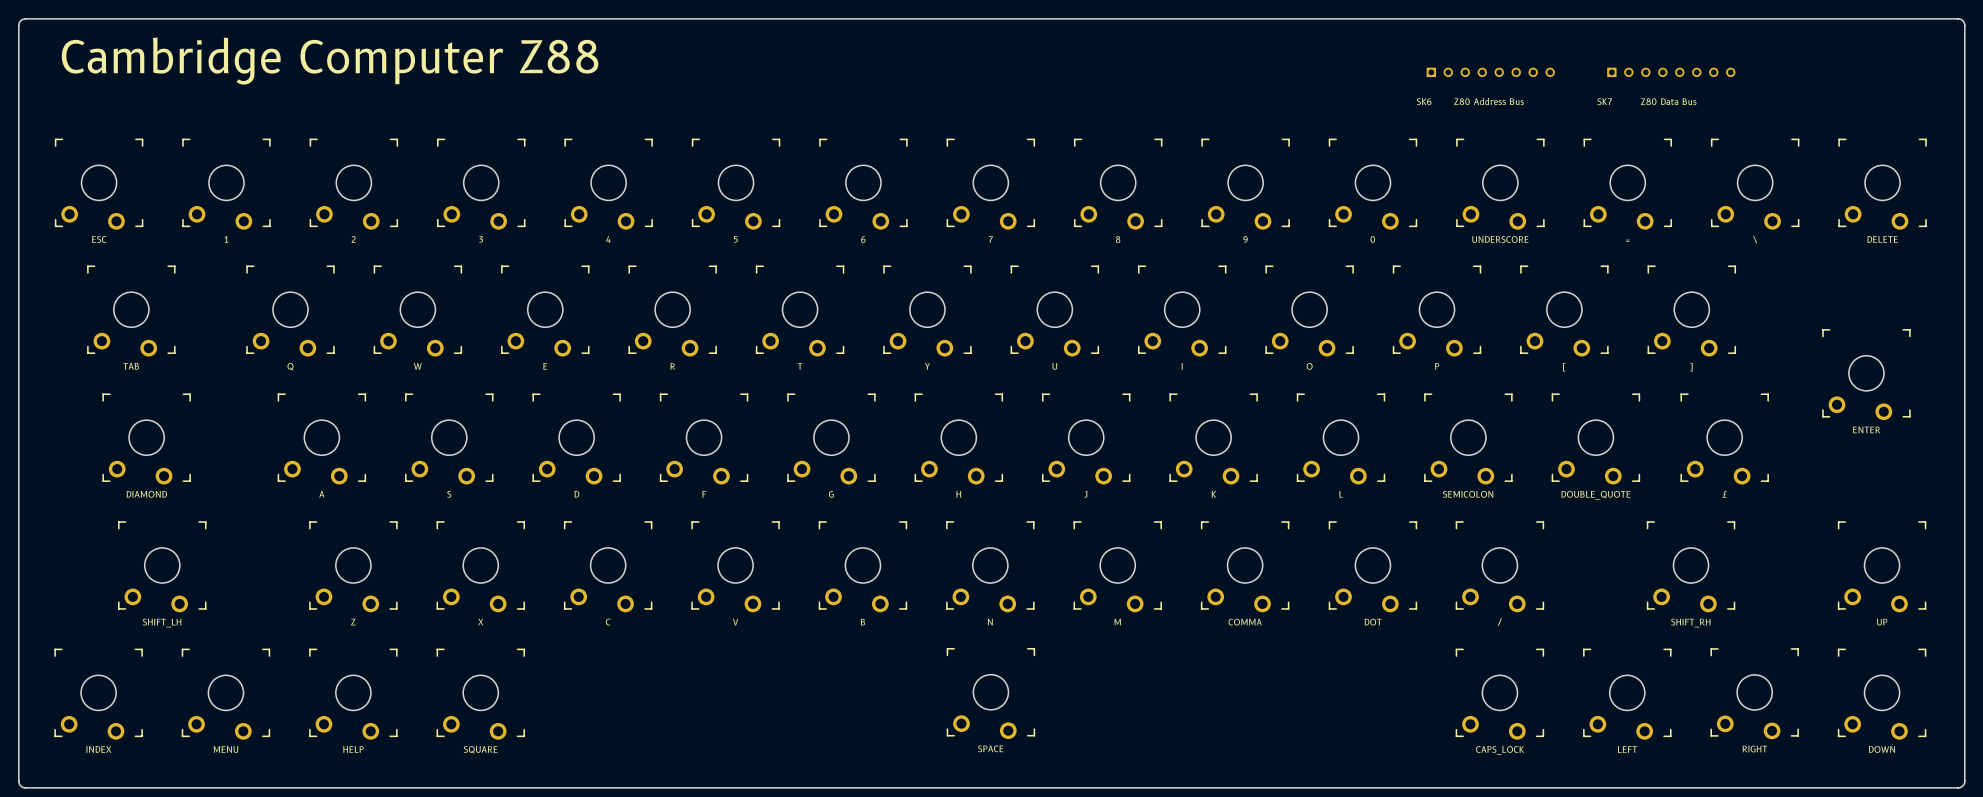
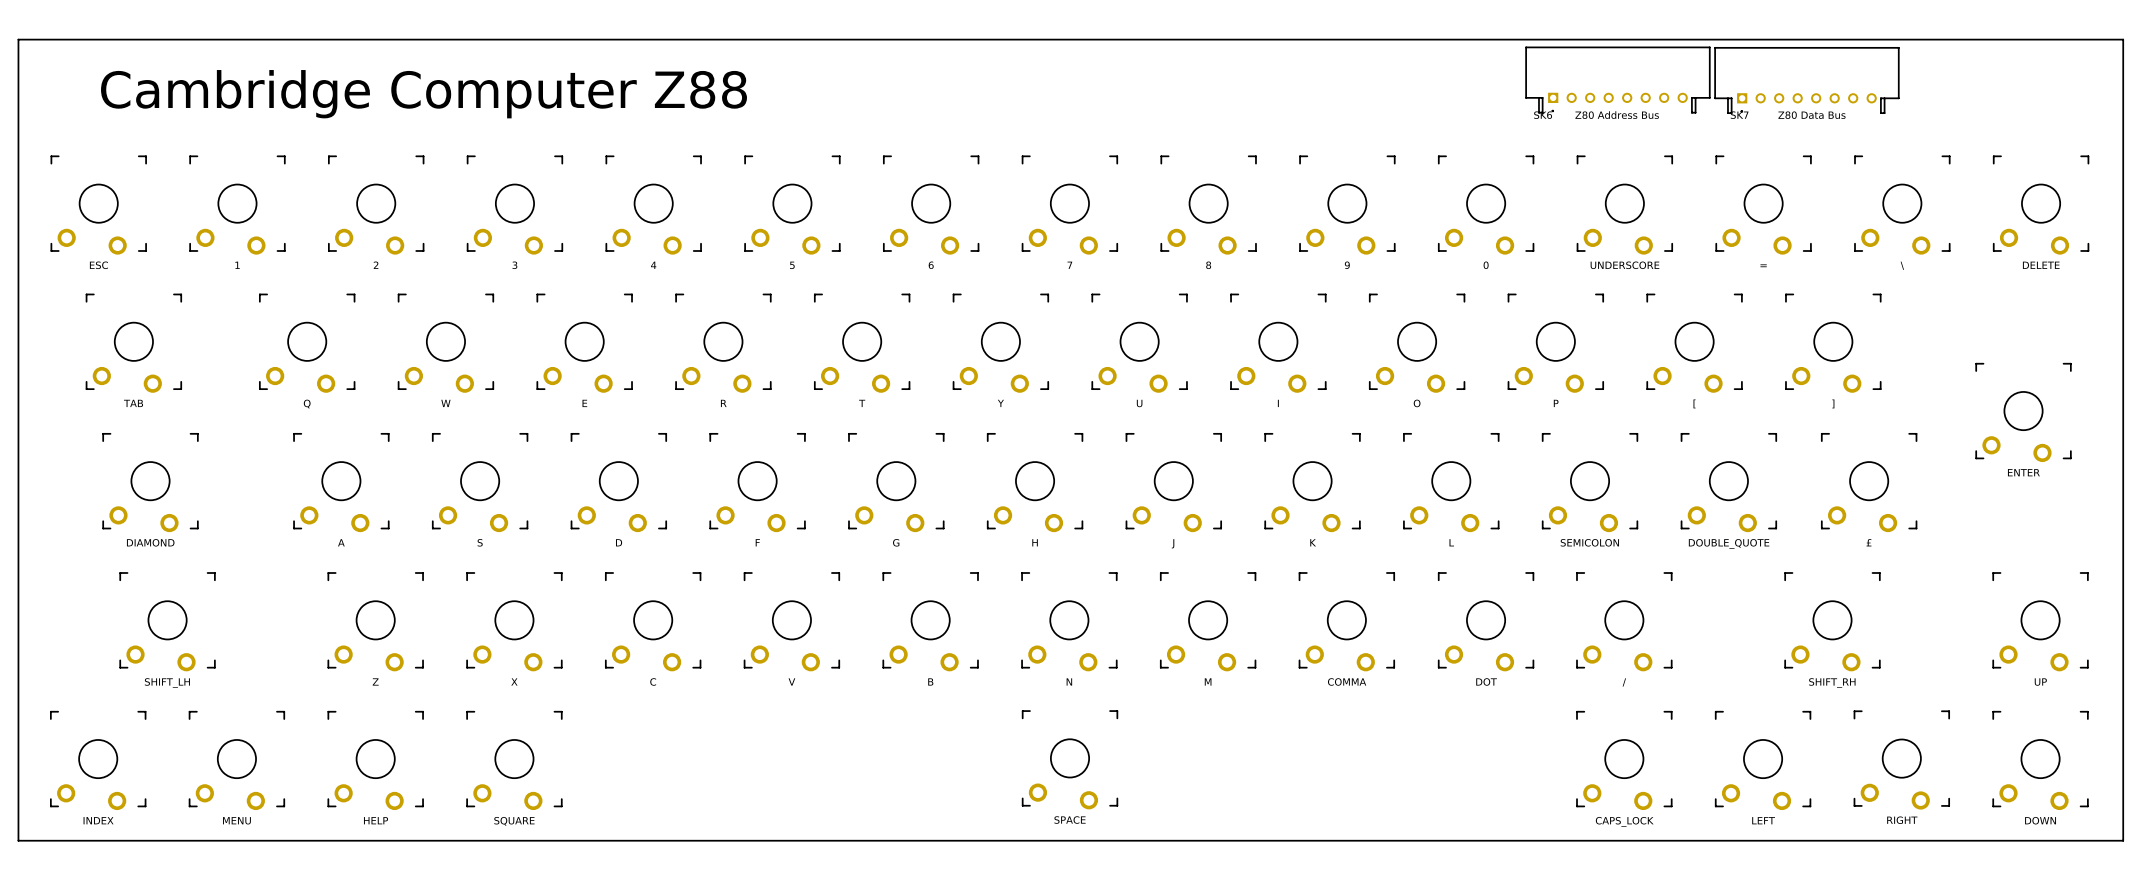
board edge: (25, 18) (1960, 19) (1964, 25) (1964, 783) (1958, 787) (22, 787) (18, 781) (18, 25) (20, 20) (25, 18) -> (18, 39) (18, 840) (2123, 840) (2123, 39) (18, 39)
text position: Cambridge Computer Z88 (330, 61) -> Cambridge Computer Z88 (424, 94)
part side: bottom (1490, 72) -> top (1617, 80)
part side: bottom (1671, 72) -> top (1806, 80)

